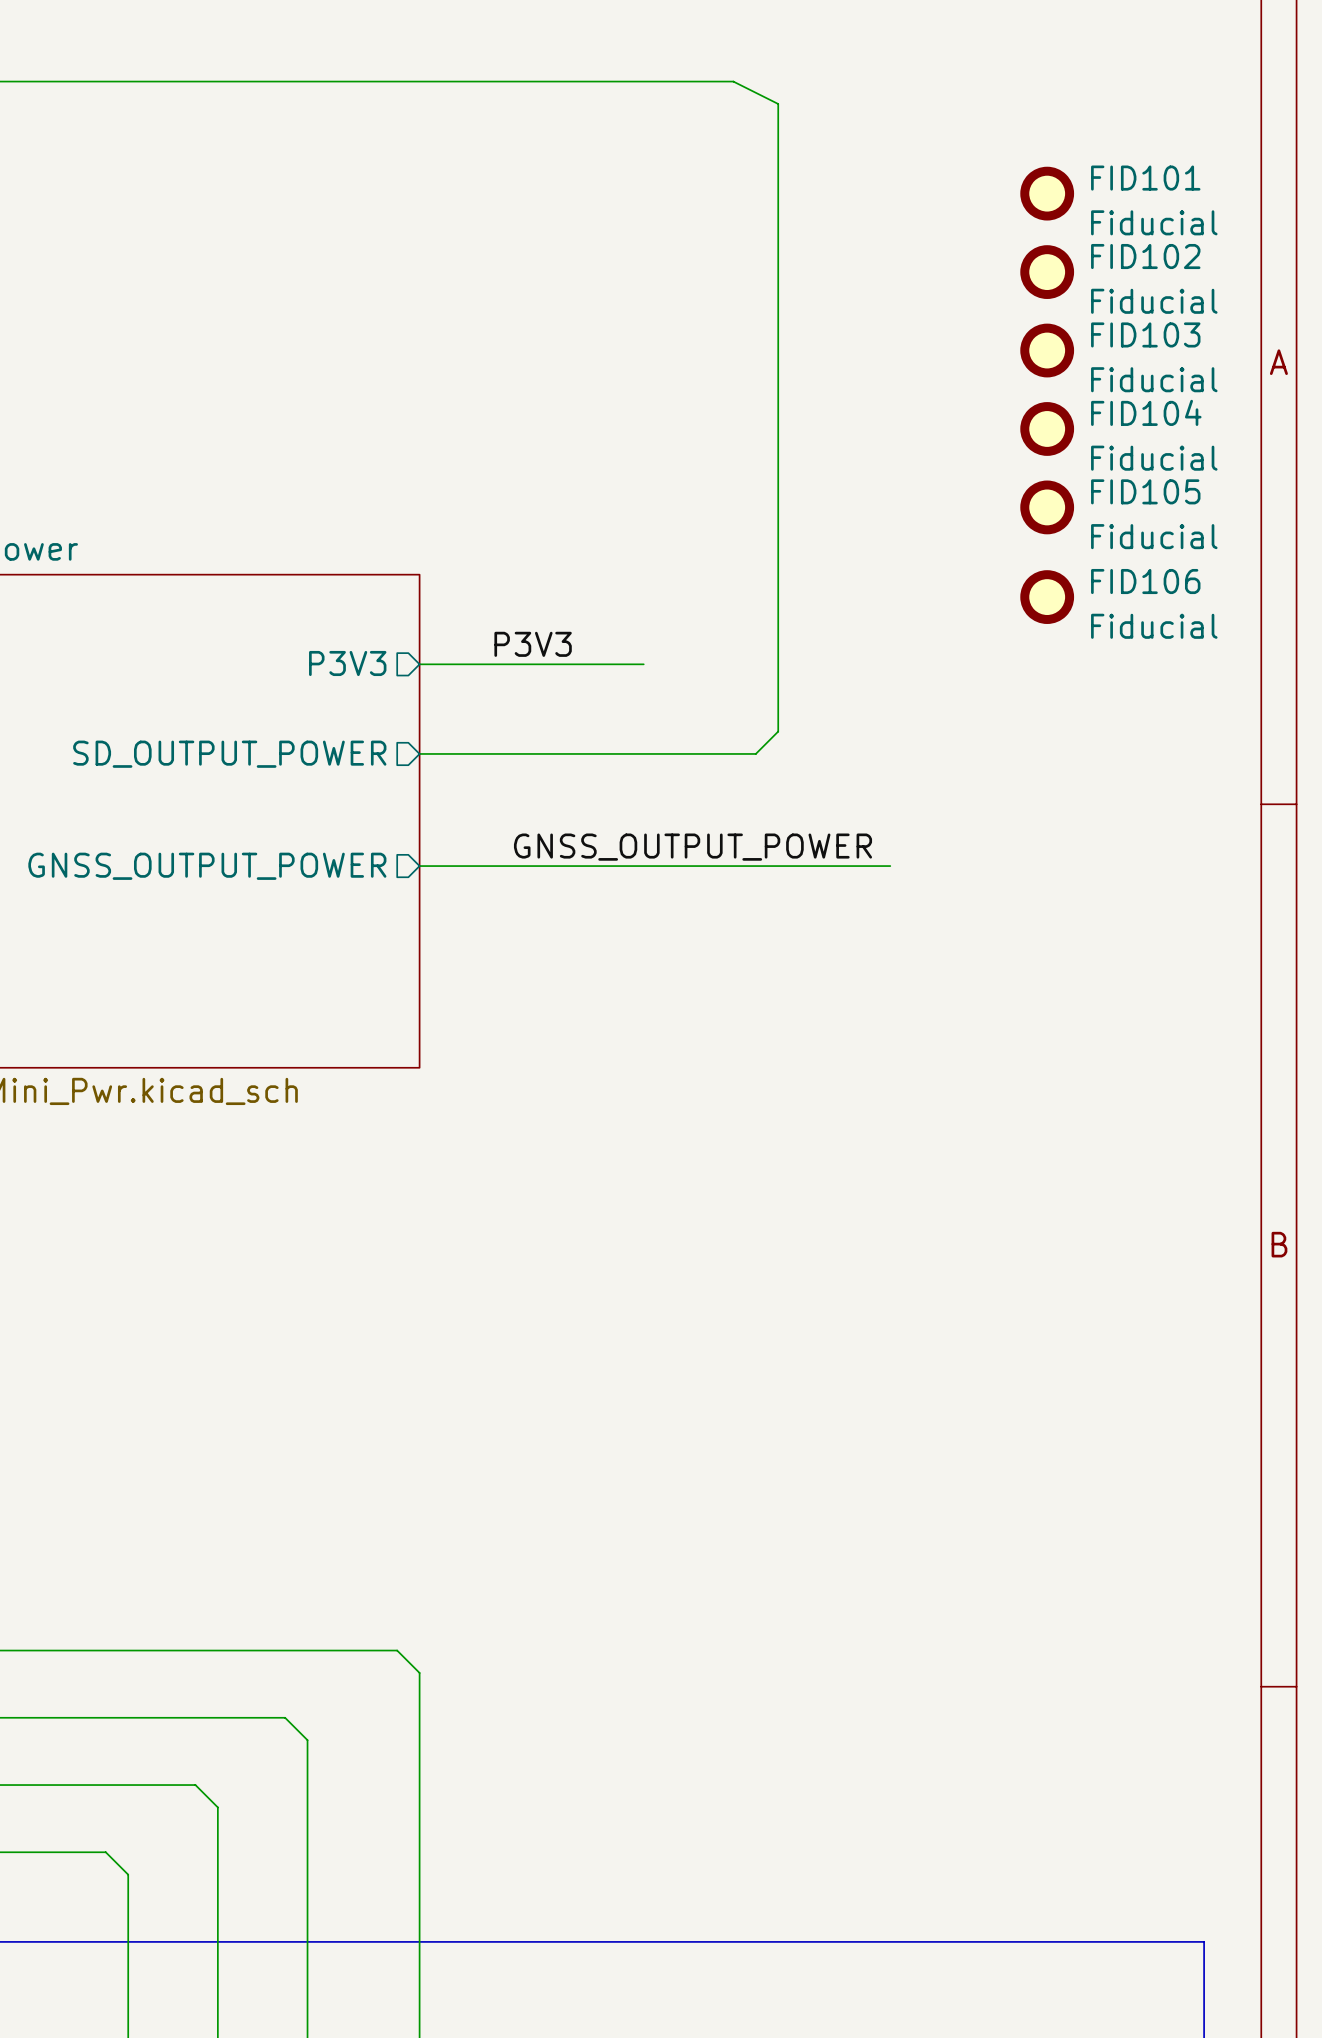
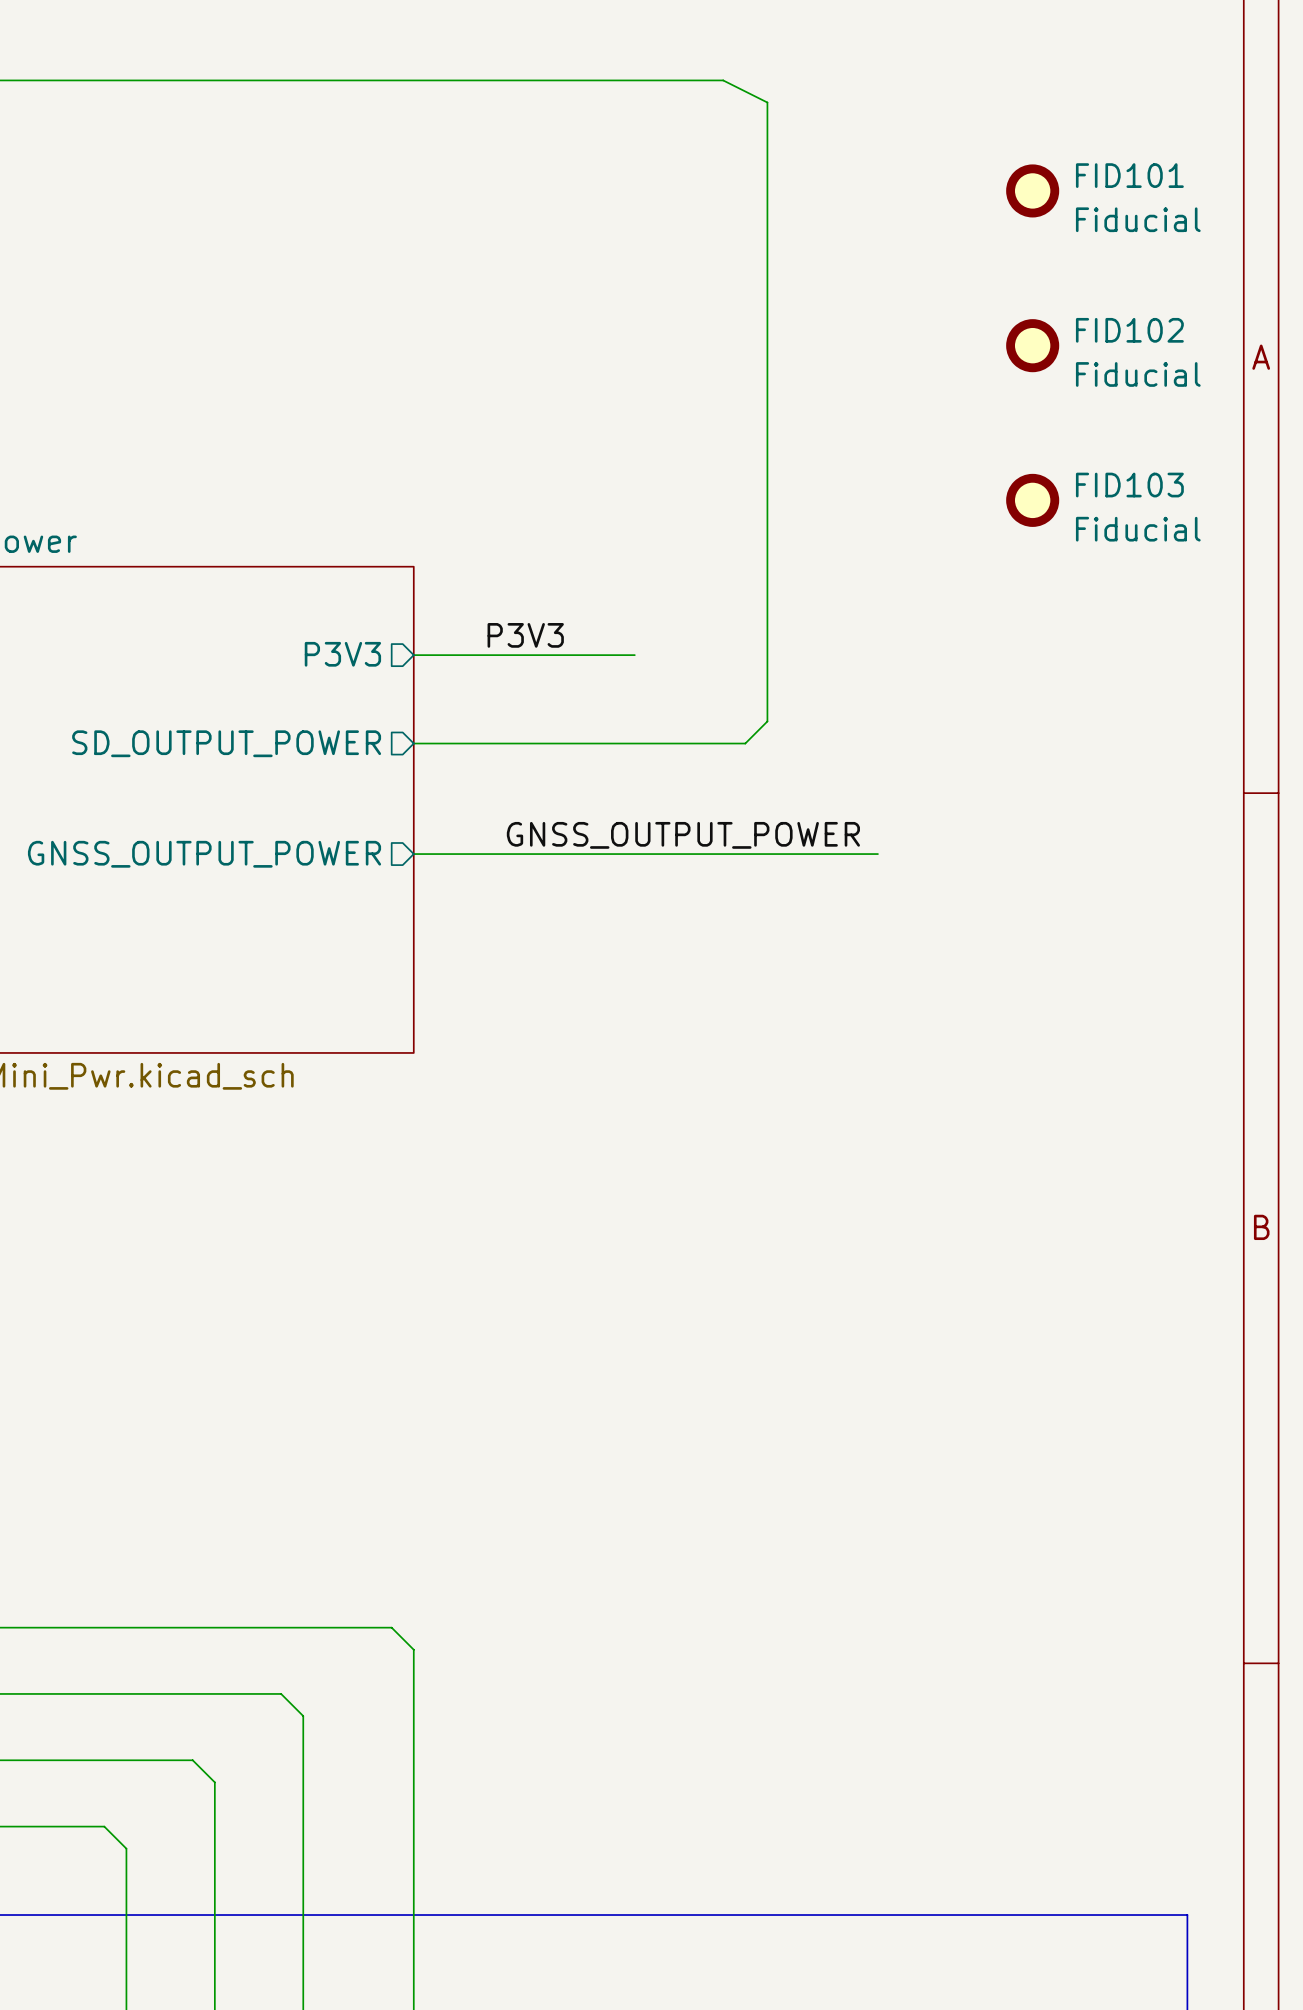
FID102: Fiducial (1047, 272) -> none
FID103 name: FID103 (1145, 334) -> FID102 (1129, 330)
FID104: Fiducial (1047, 428) -> none
FID105 name: FID105 (1145, 491) -> FID103 (1129, 485)
FID106: Fiducial (1047, 597) -> none

